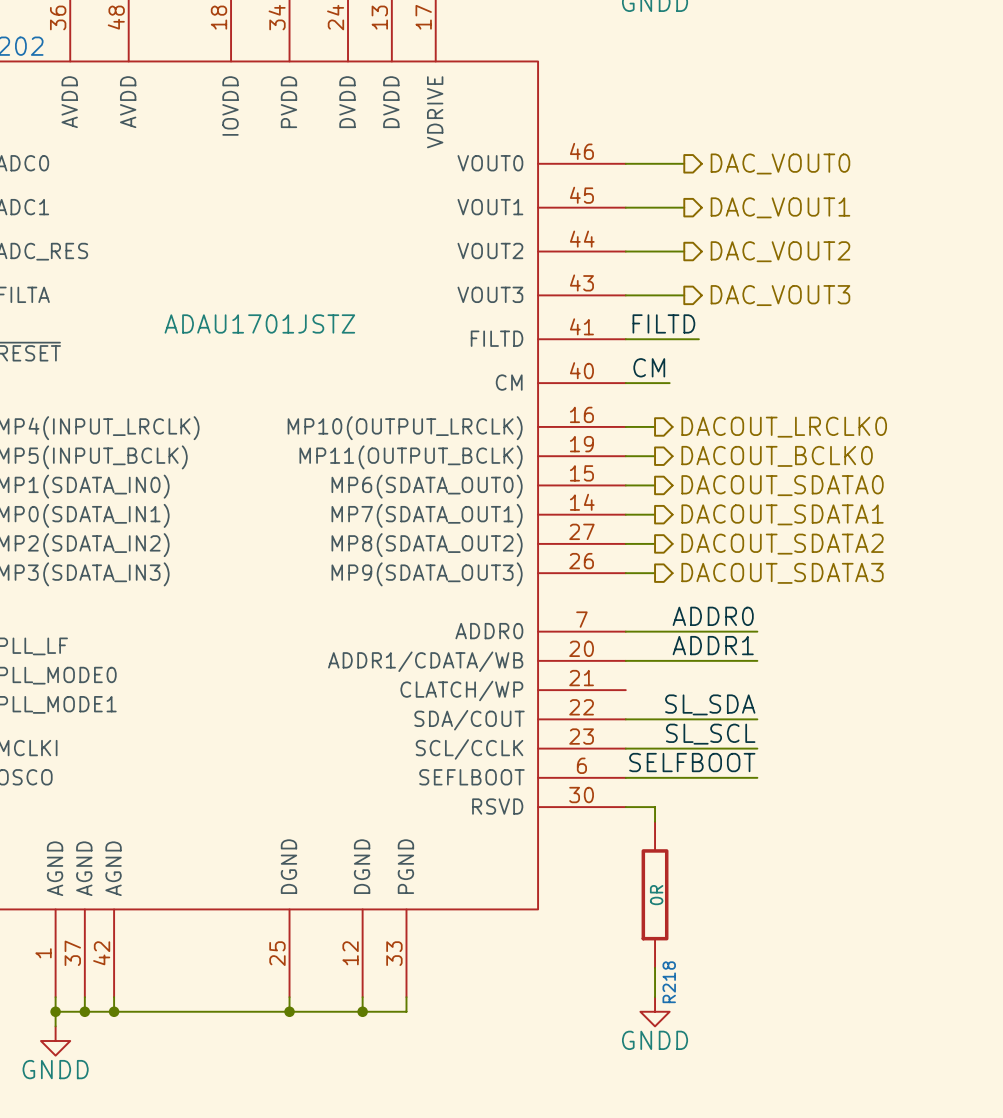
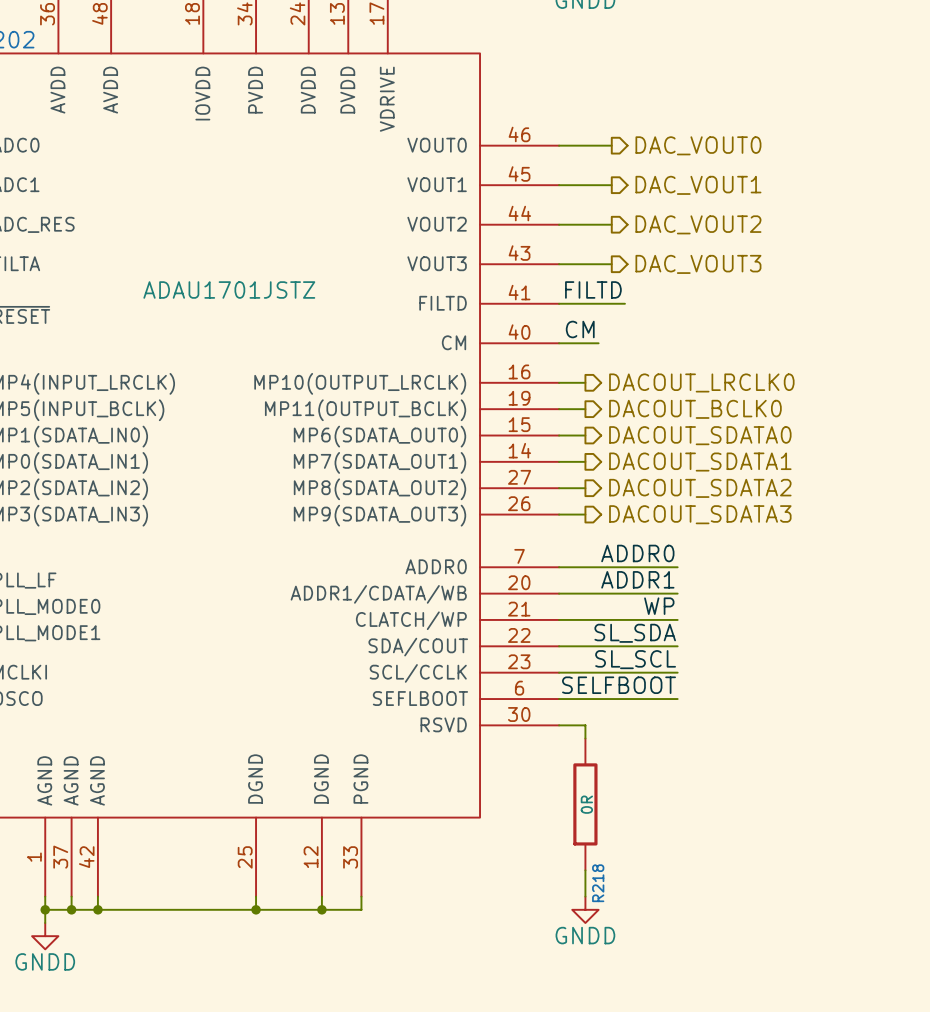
label: none -> WP (659, 606)
wire: none -> (559, 619) (677, 619)

